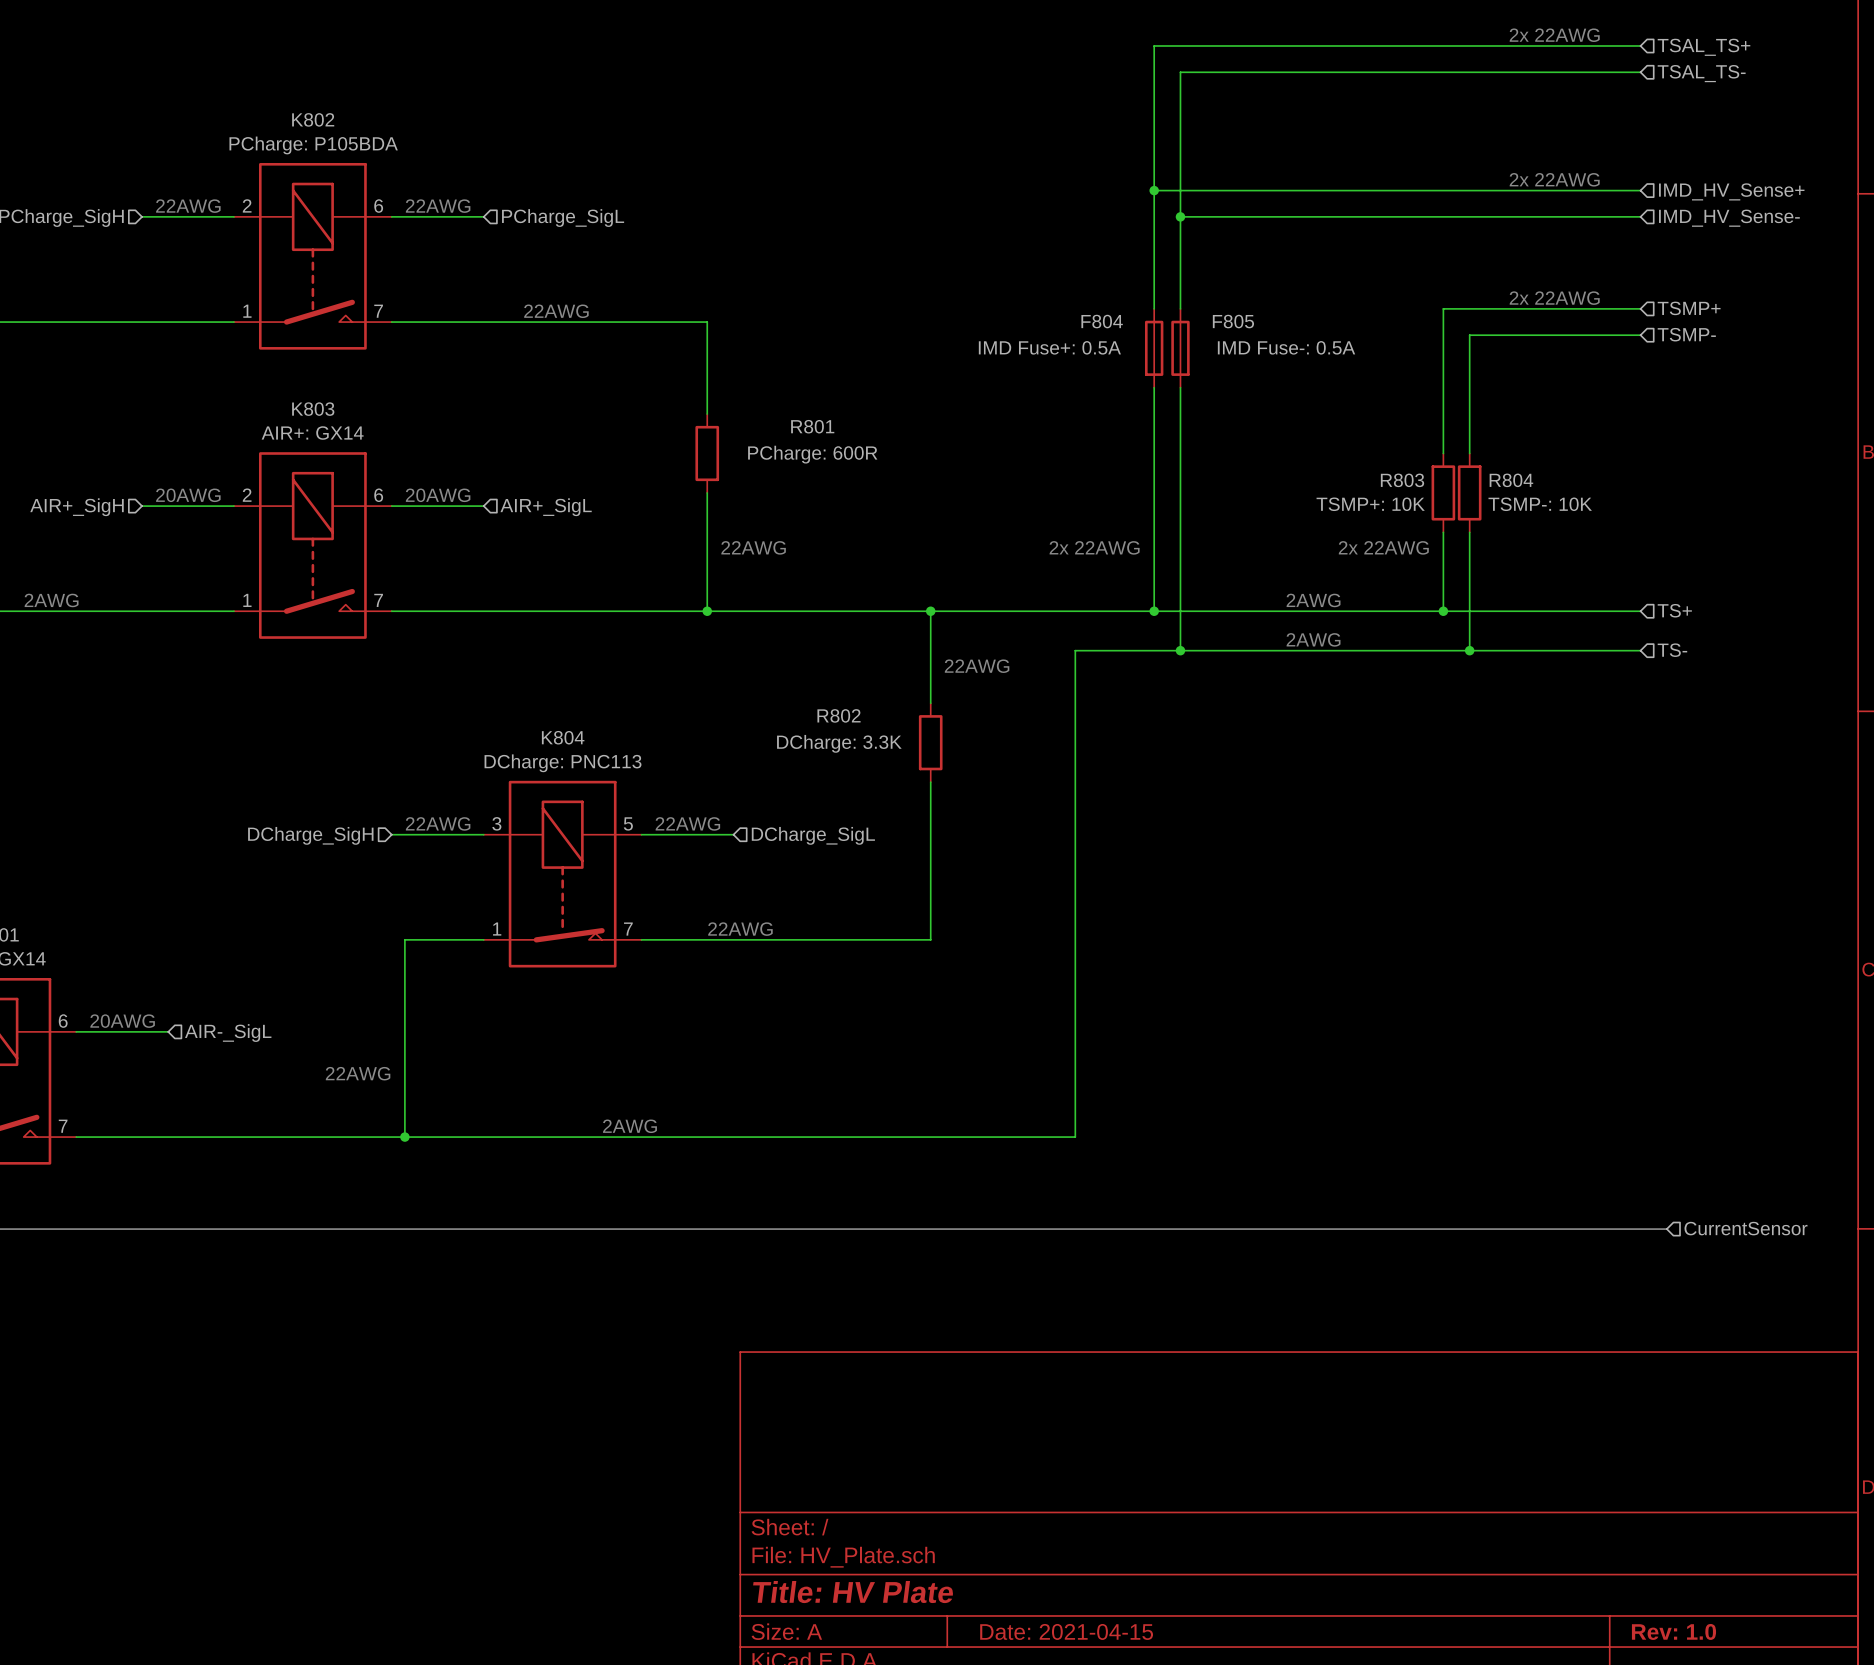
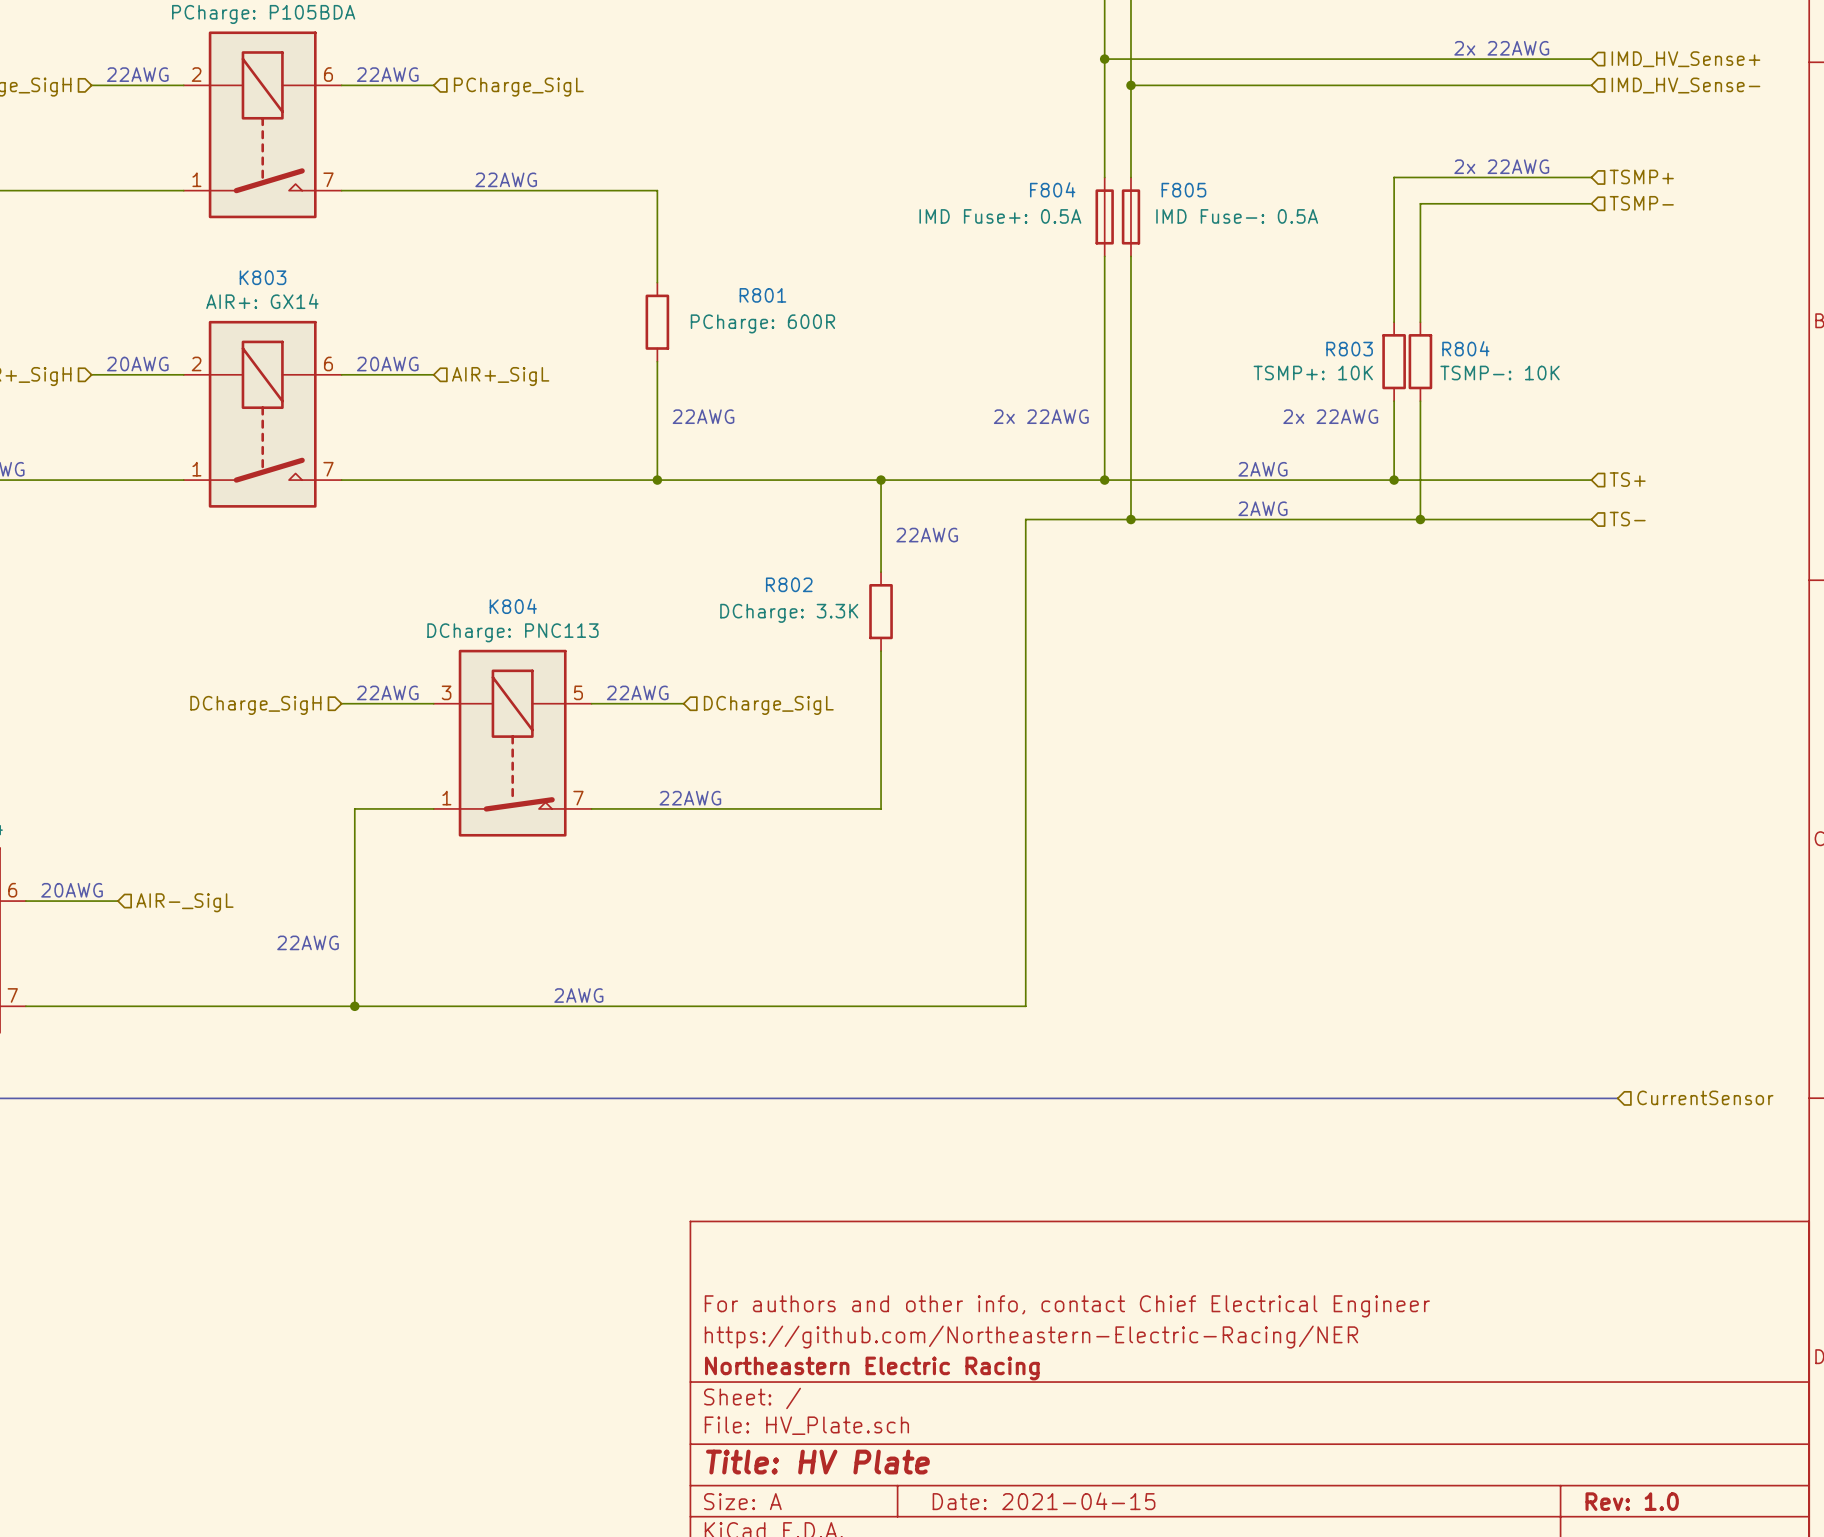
title block: none -> For authors and other info, contact Chief Electrical Engineer (1067, 1306)
title block: none -> https://github.com/Northeastern-Electric-Racing/NER (1031, 1337)
title block: none -> Northeastern Electric Racing (872, 1368)

